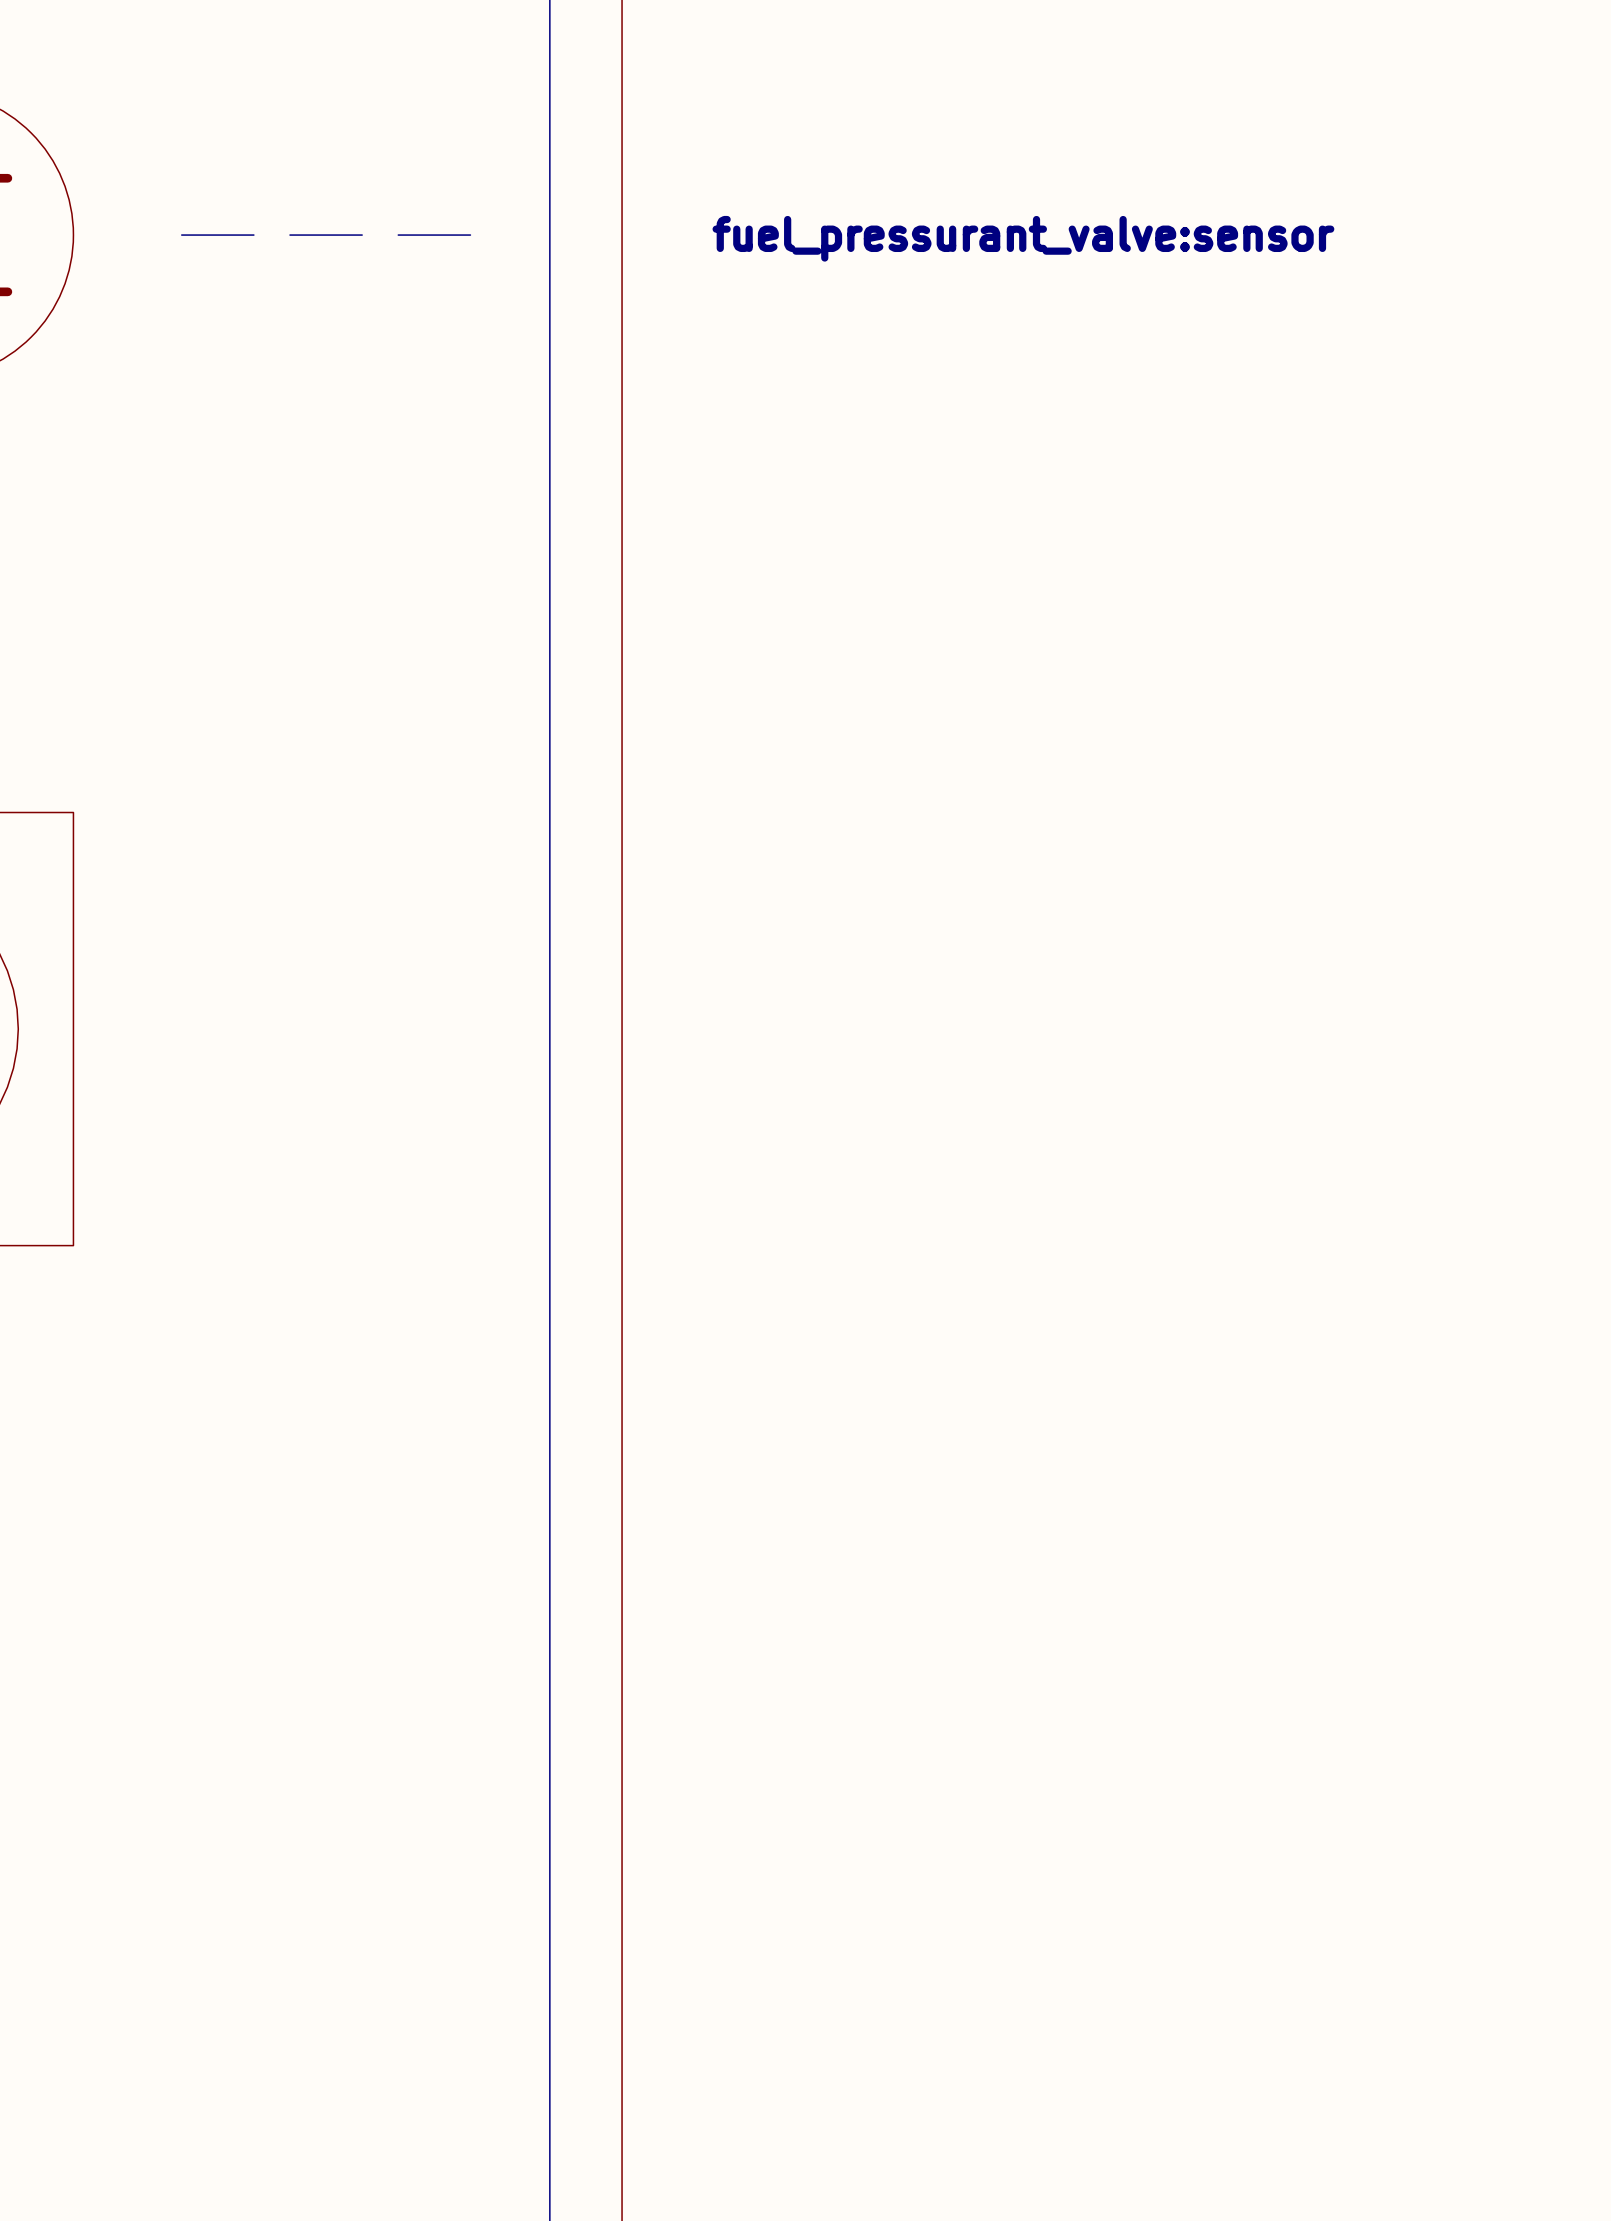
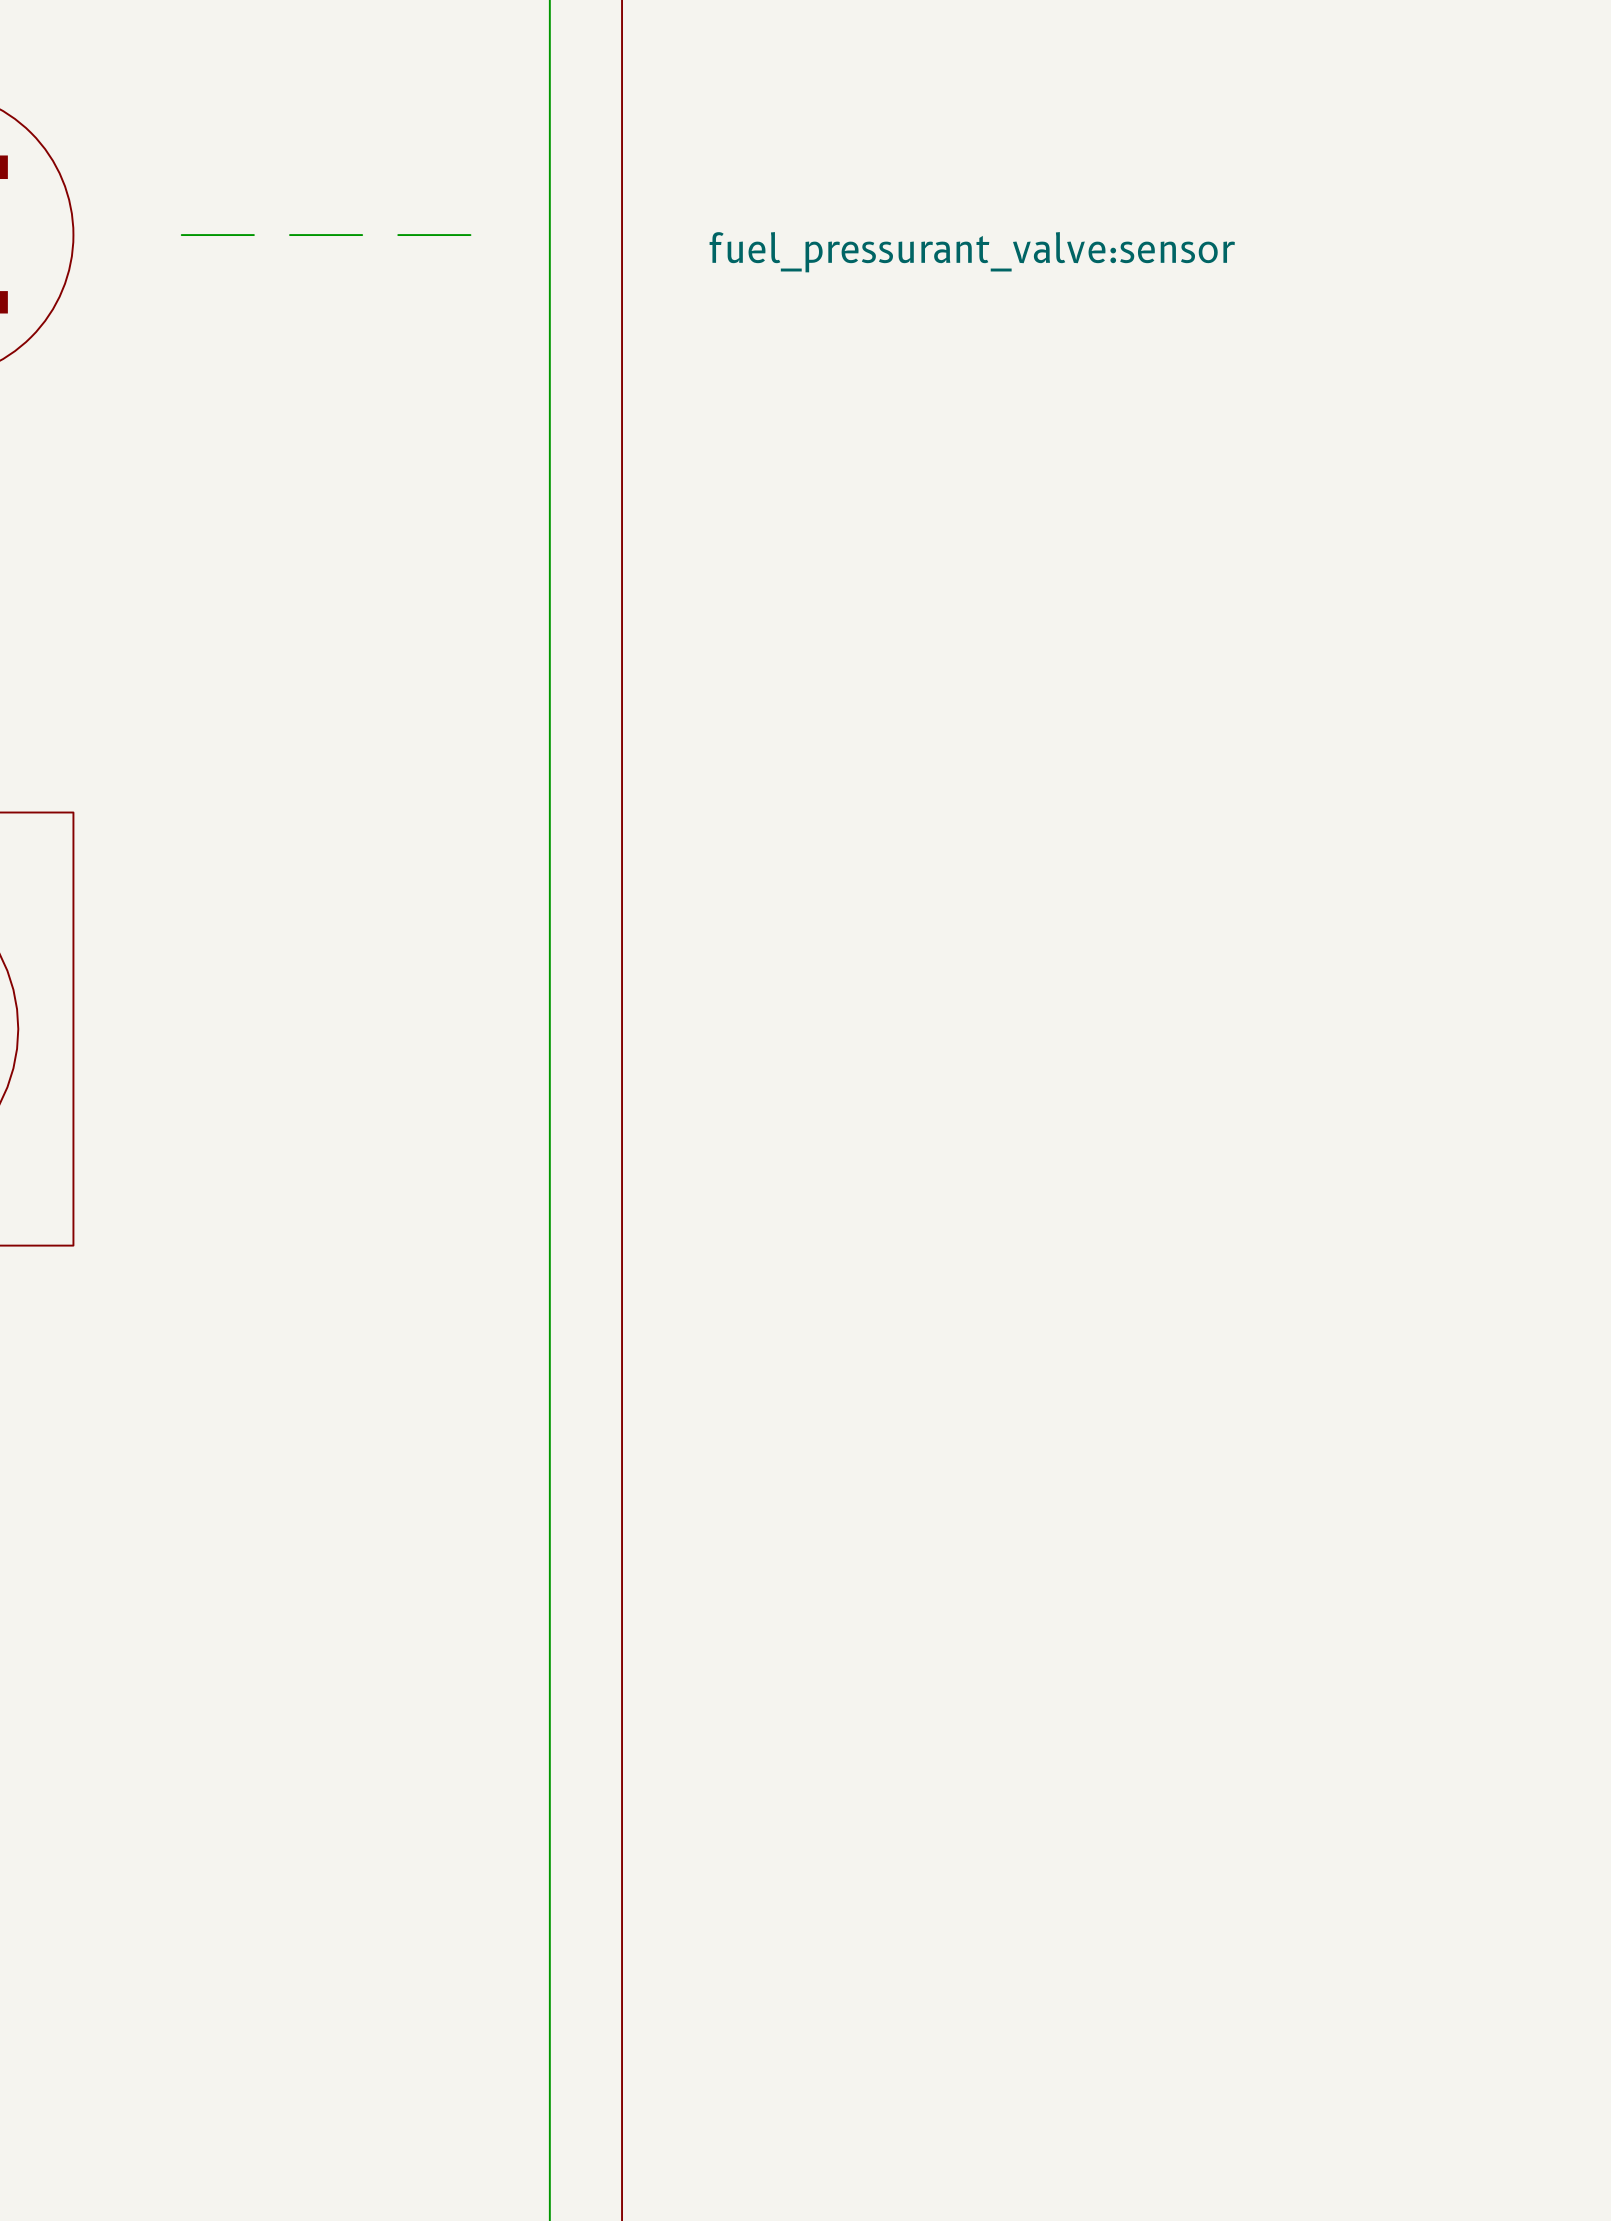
part value position: fuel_pressurant_valve:sensor (1023, 238) -> fuel_pressurant_valve:sensor (972, 252)

